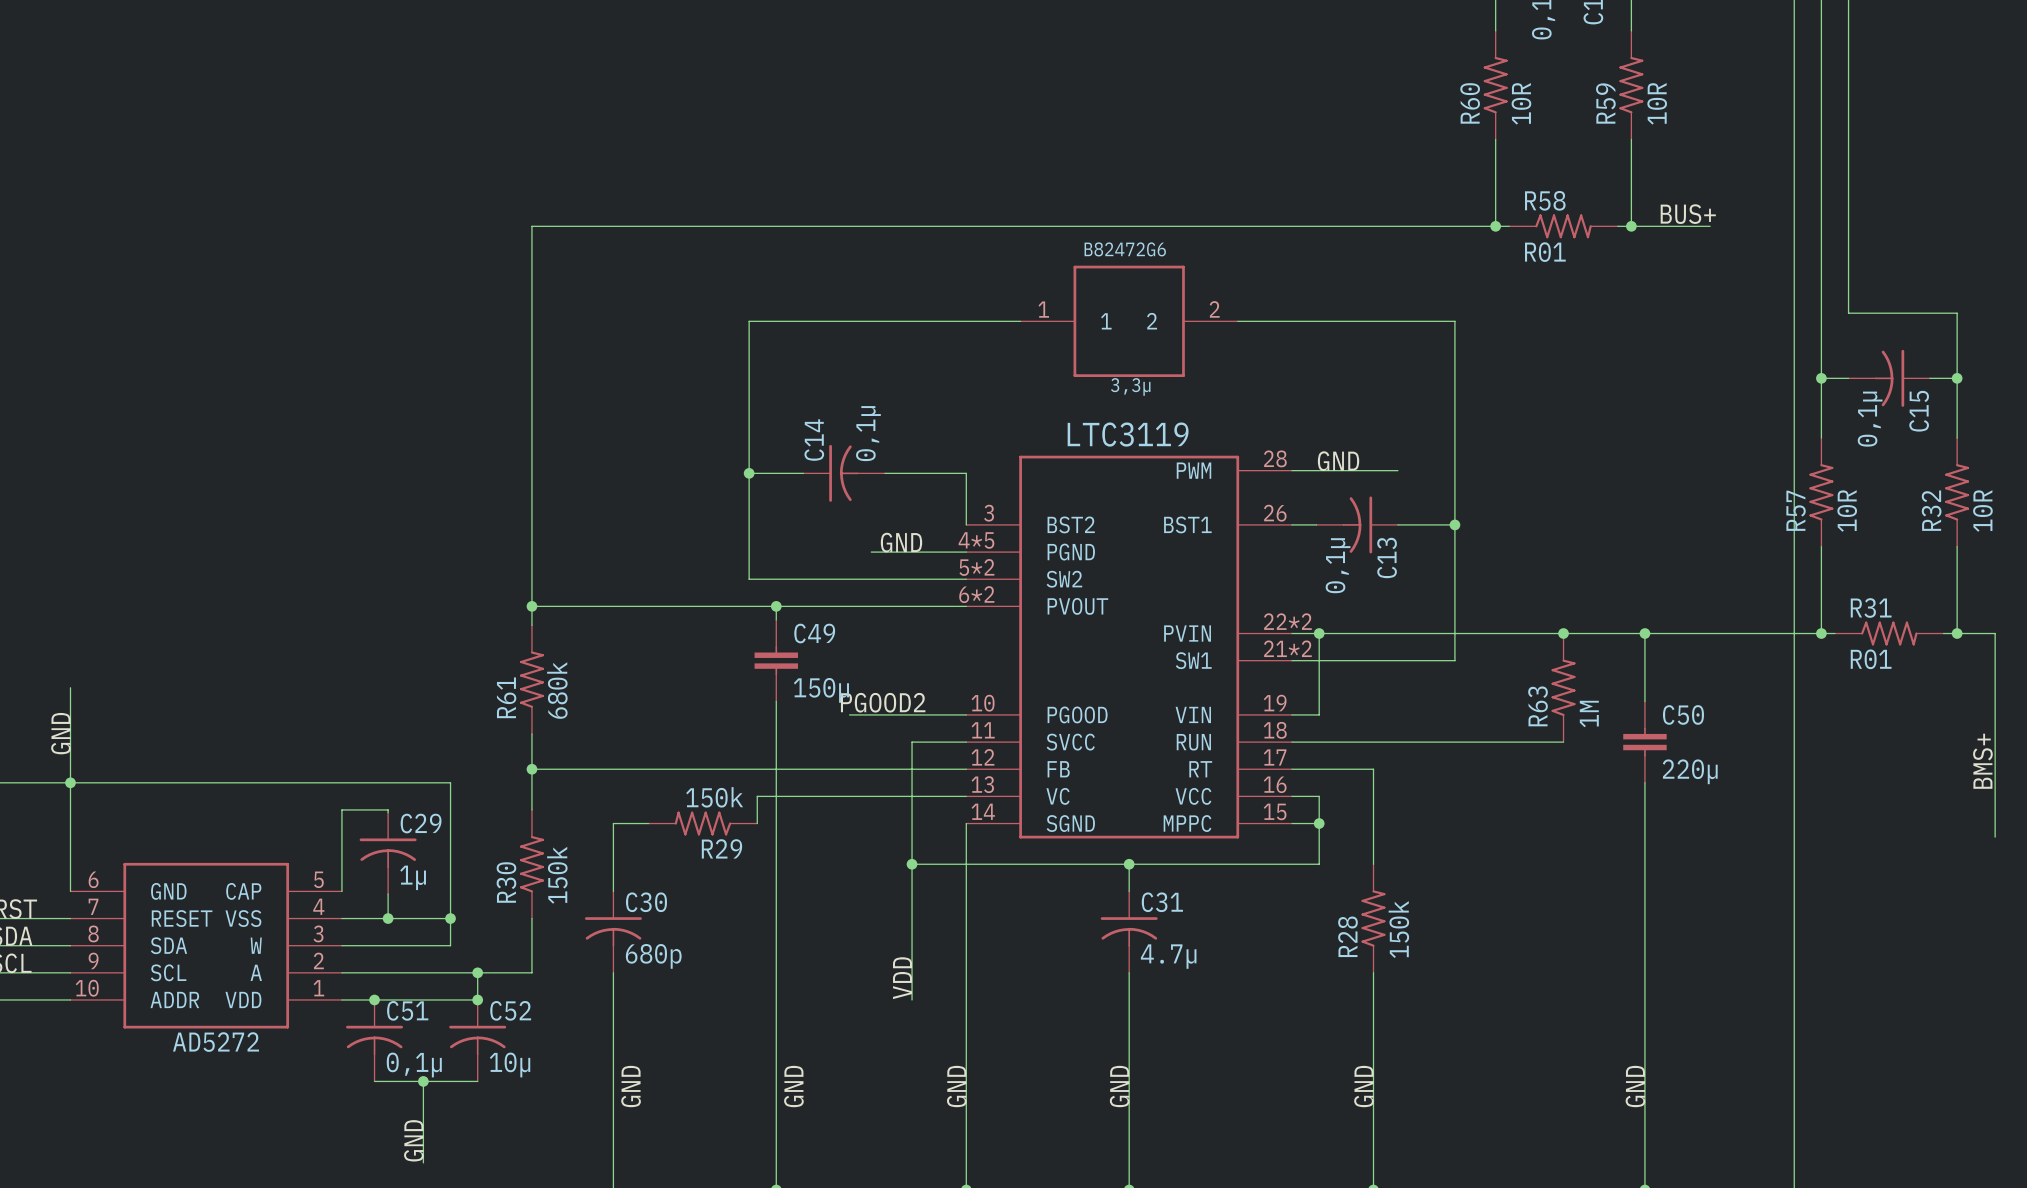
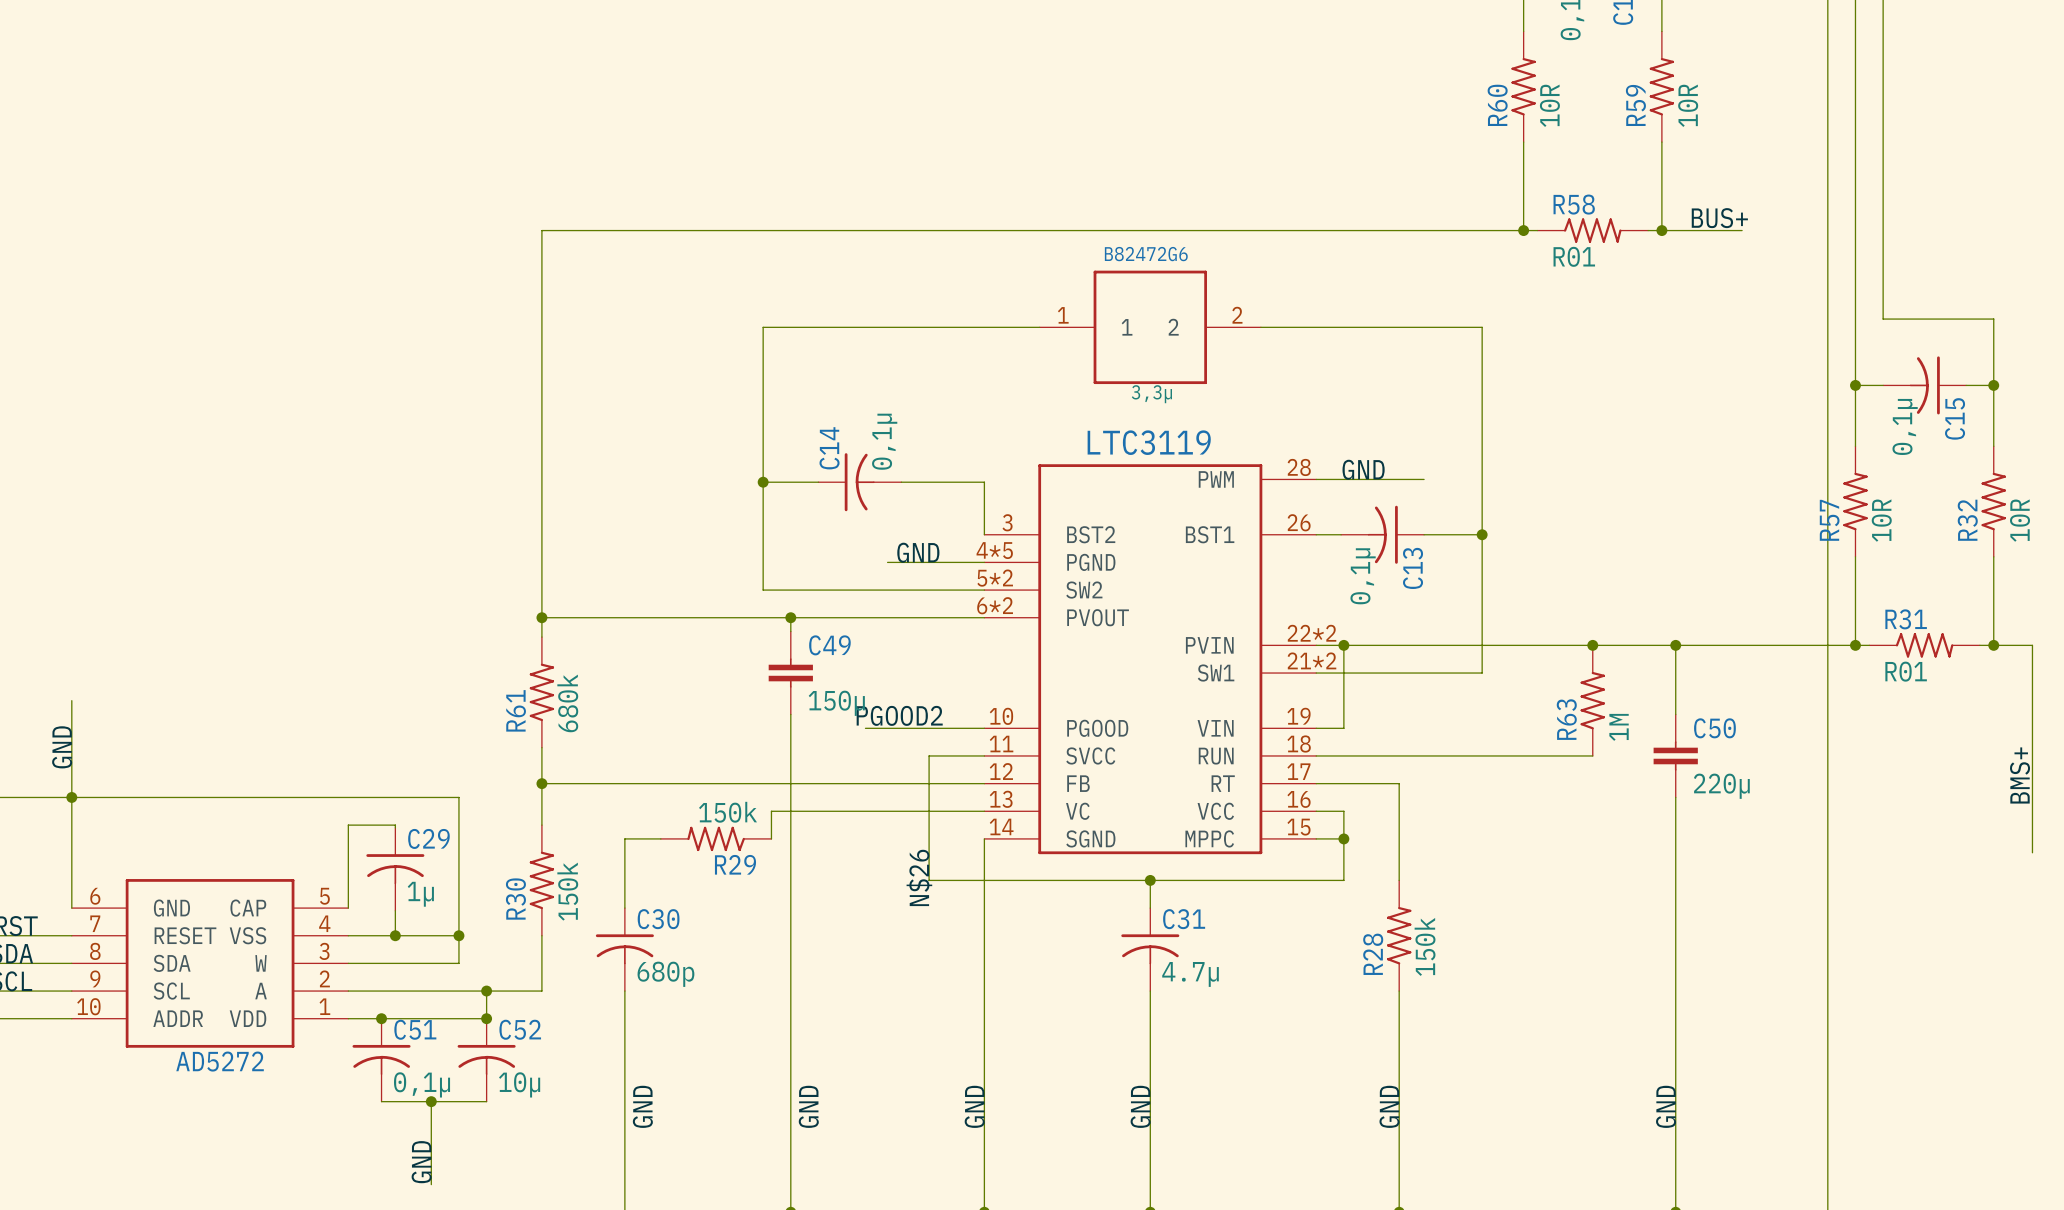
label: none -> N$26 (919, 877)
wire: (912, 864) (912, 999) -> none
junction: (912, 864) -> none
label: VDD (902, 978) -> none

